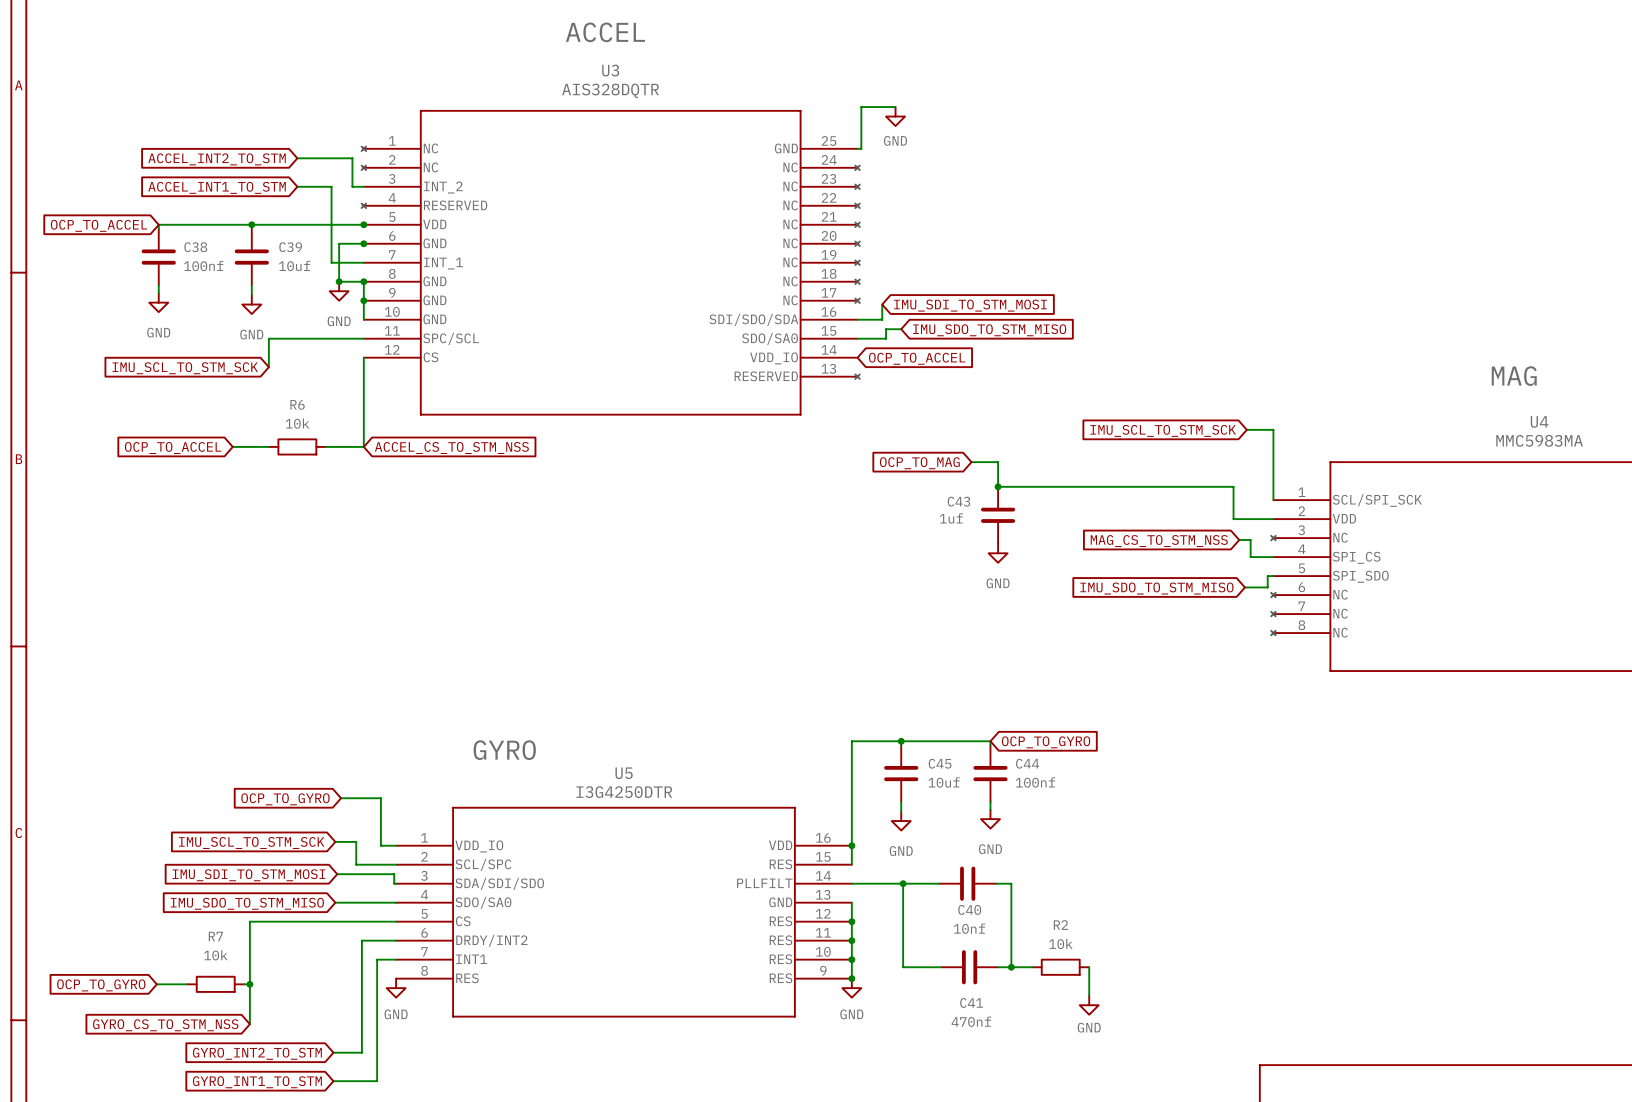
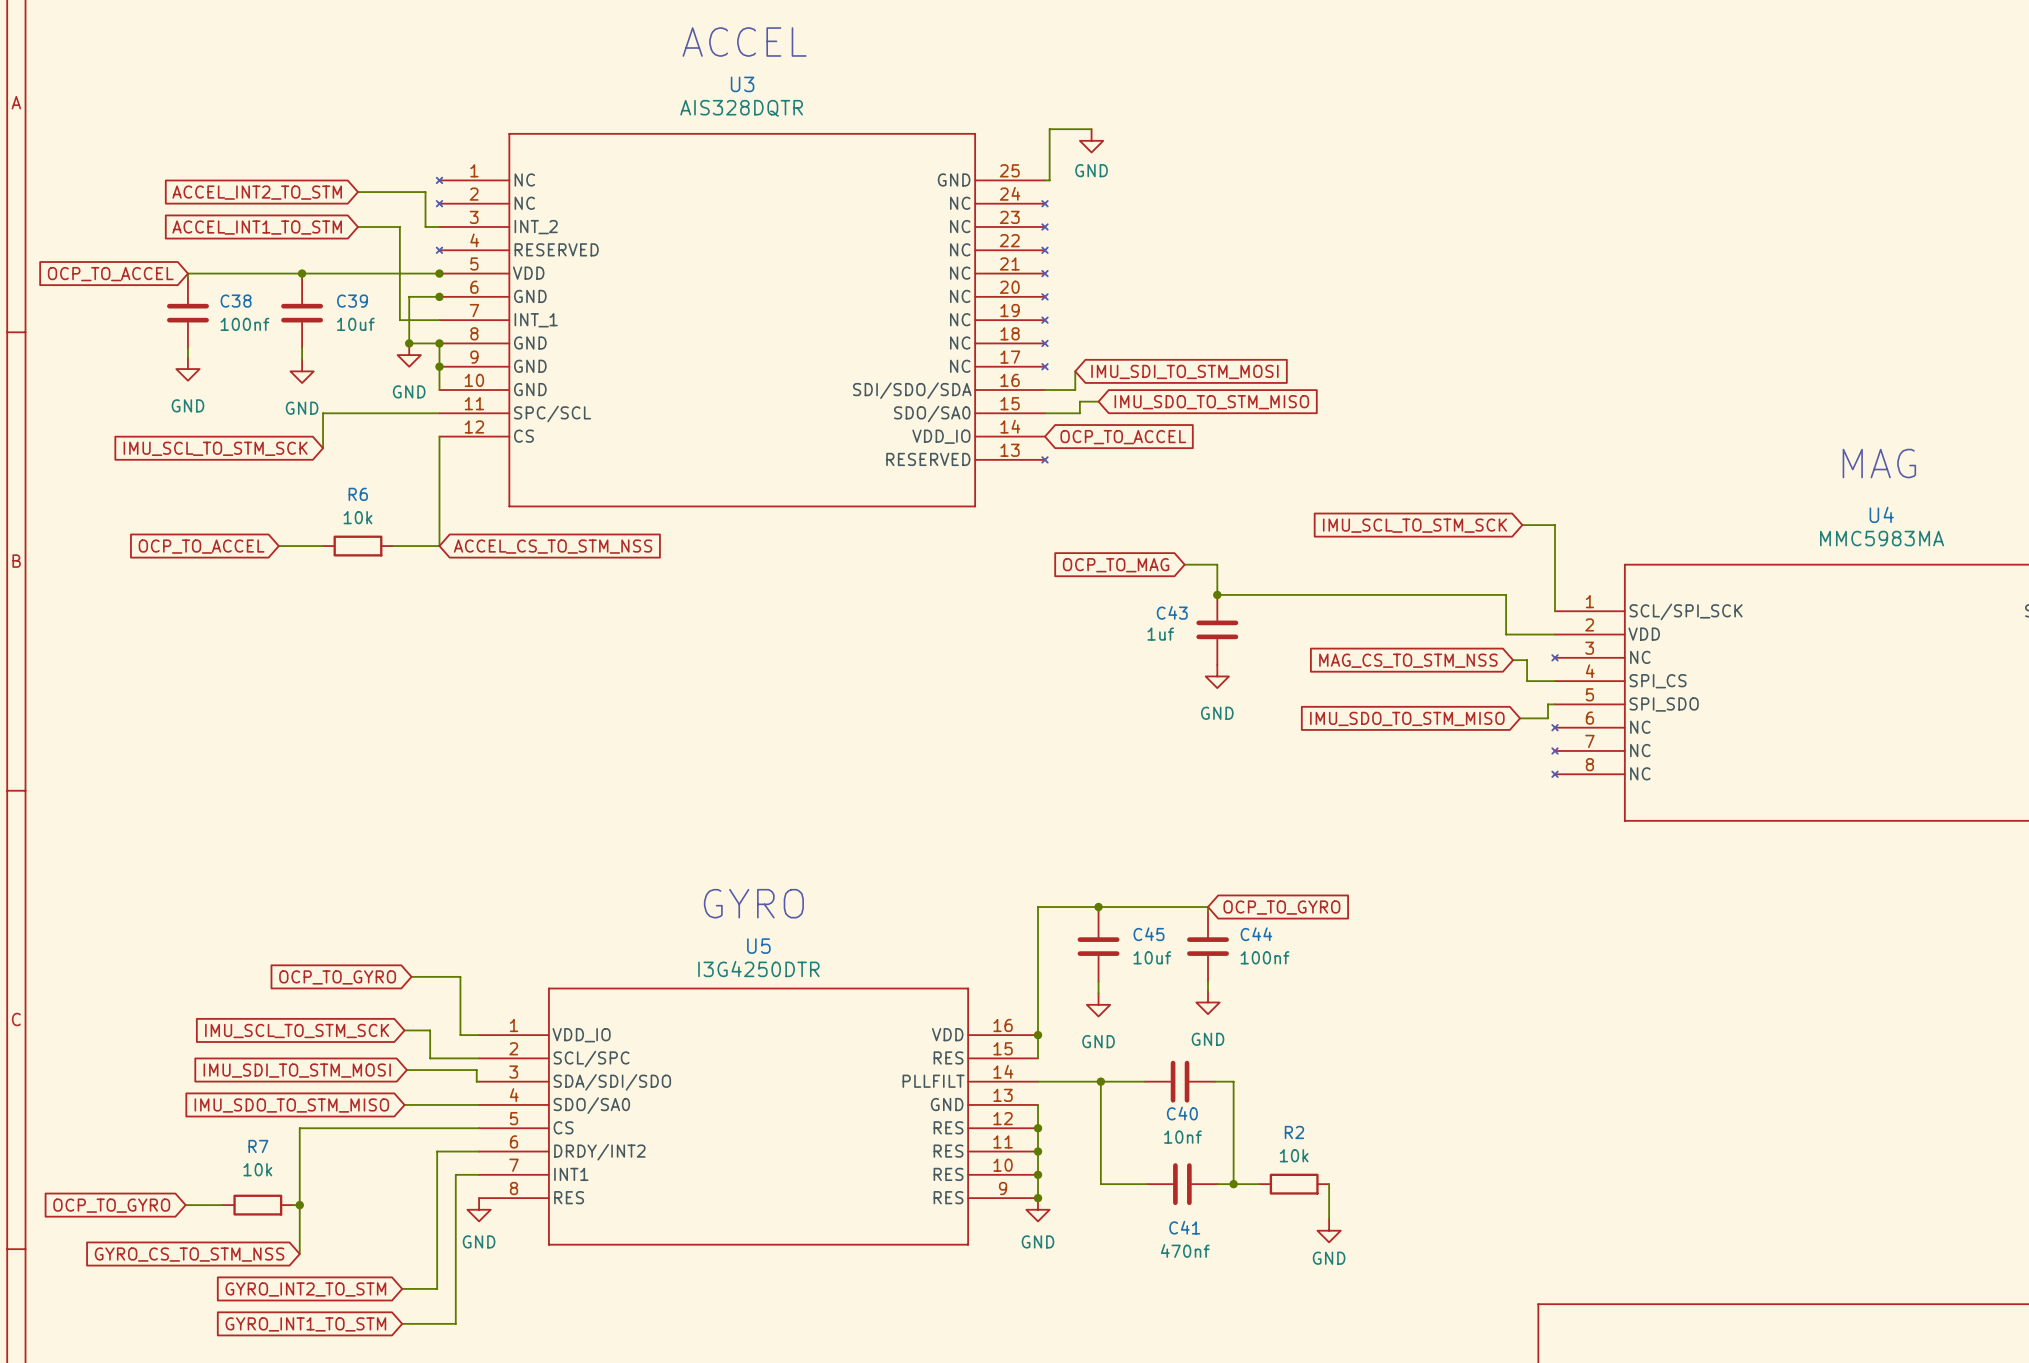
label: ACCEL (605, 32) -> none
text: none -> ACCEL (744, 42)
label: MAG (1514, 376) -> none
text: none -> MAG (1879, 463)
text: none -> GYRO (753, 903)
label: GYRO (504, 750) -> none

